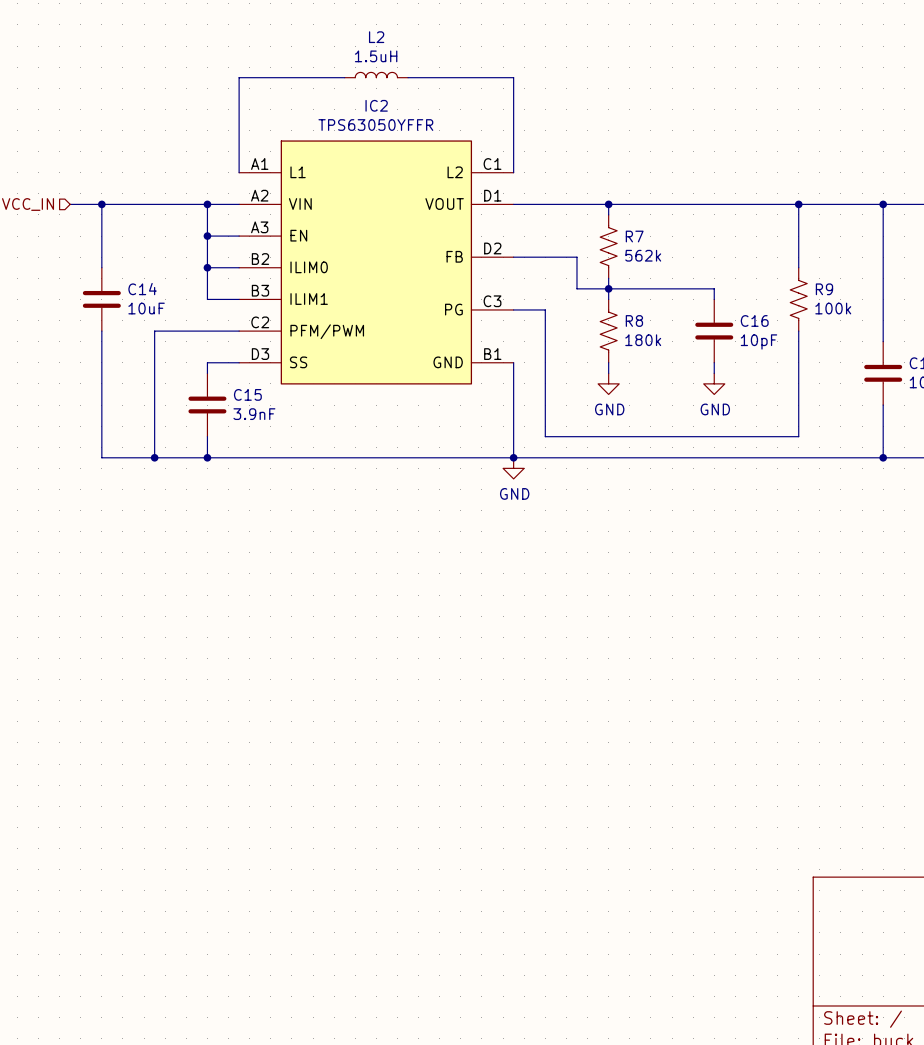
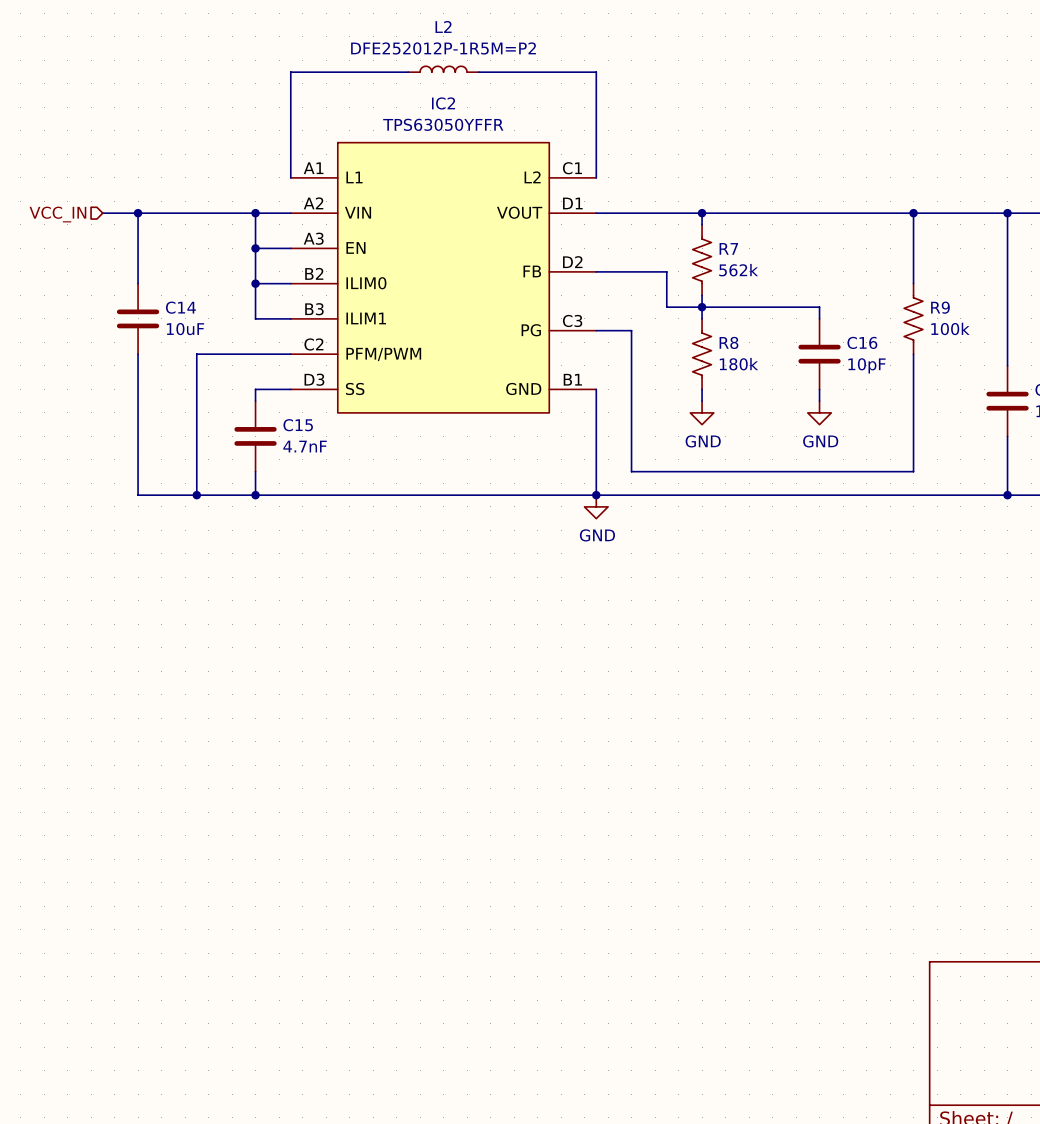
L2 value: 1.5uH (376, 56) -> DFE252012P-1R5M=P2 (443, 48)
C15 value: 3.9nF (254, 414) -> 4.7nF (305, 446)

